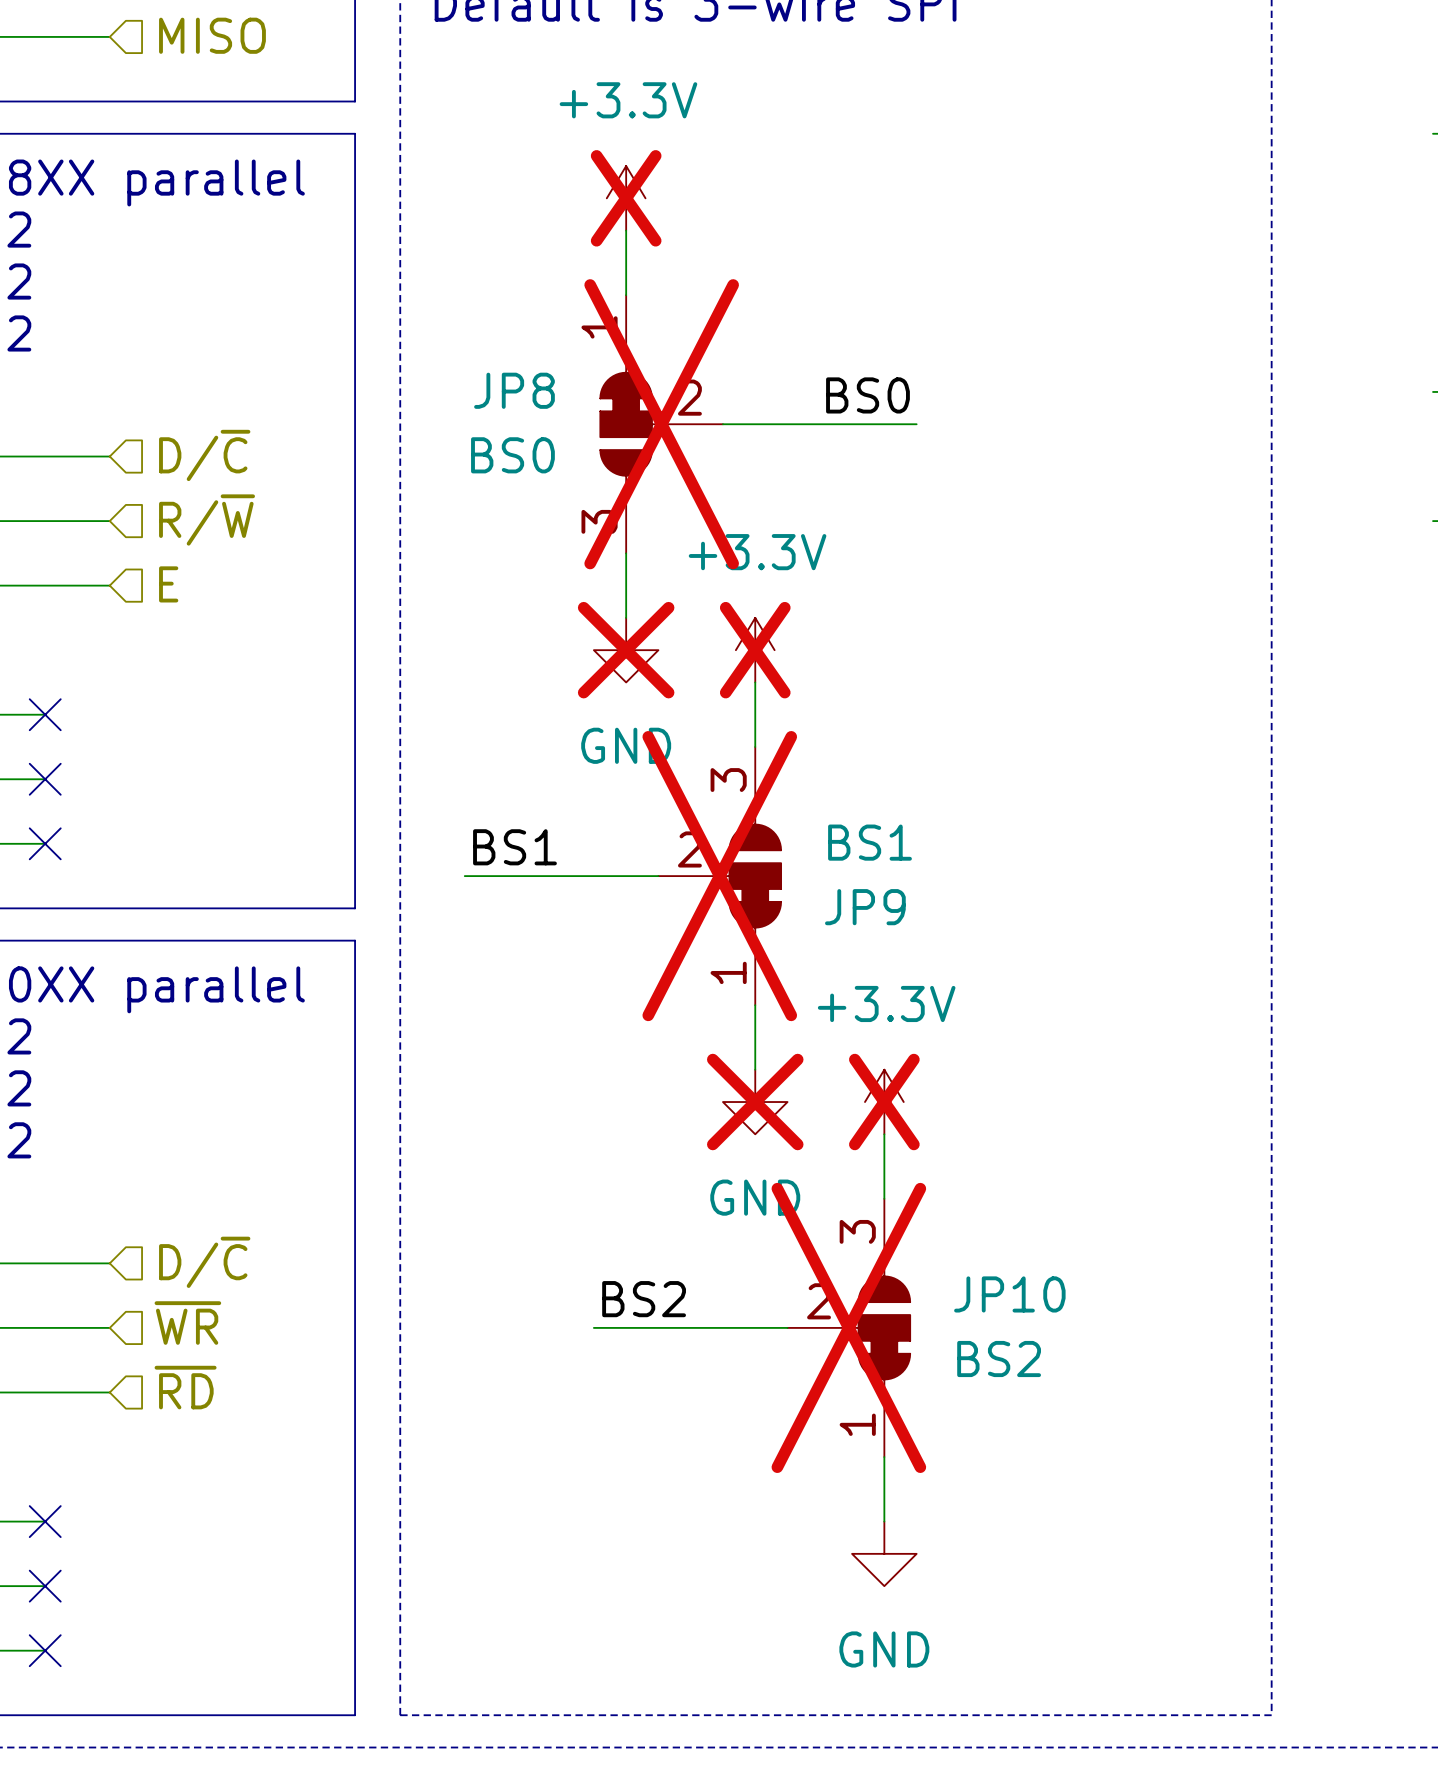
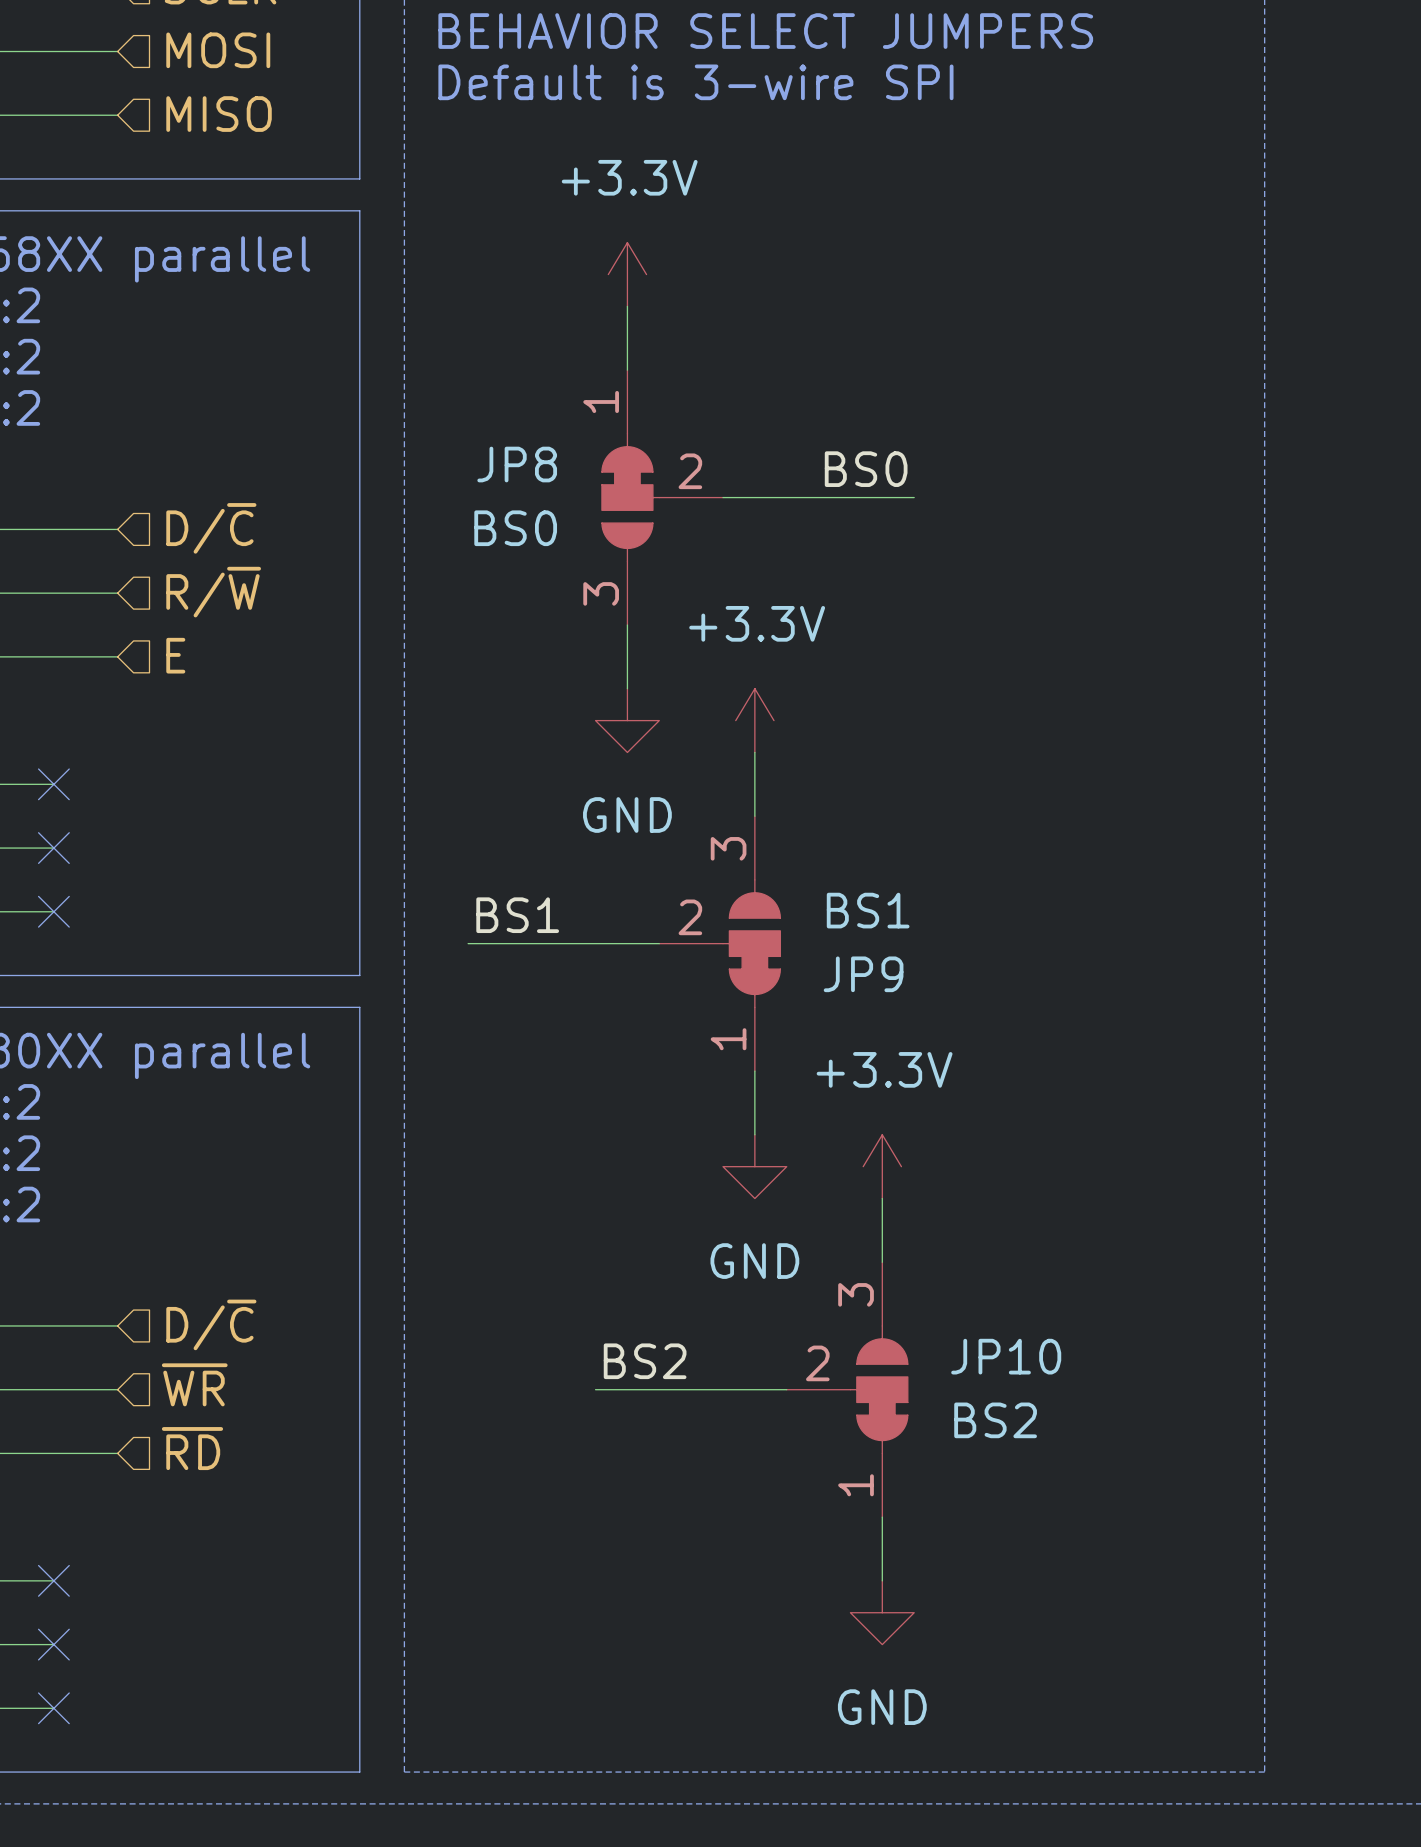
power symbol do-not-place cross: (626, 198) -> none
JP8 do-not-place cross: (661, 424) -> none
power symbol do-not-place cross: (626, 650) -> none
power symbol do-not-place cross: (755, 650) -> none
JP9 do-not-place cross: (719, 876) -> none
power symbol do-not-place cross: (755, 1102) -> none
power symbol do-not-place cross: (884, 1102) -> none
JP10 do-not-place cross: (848, 1327) -> none

